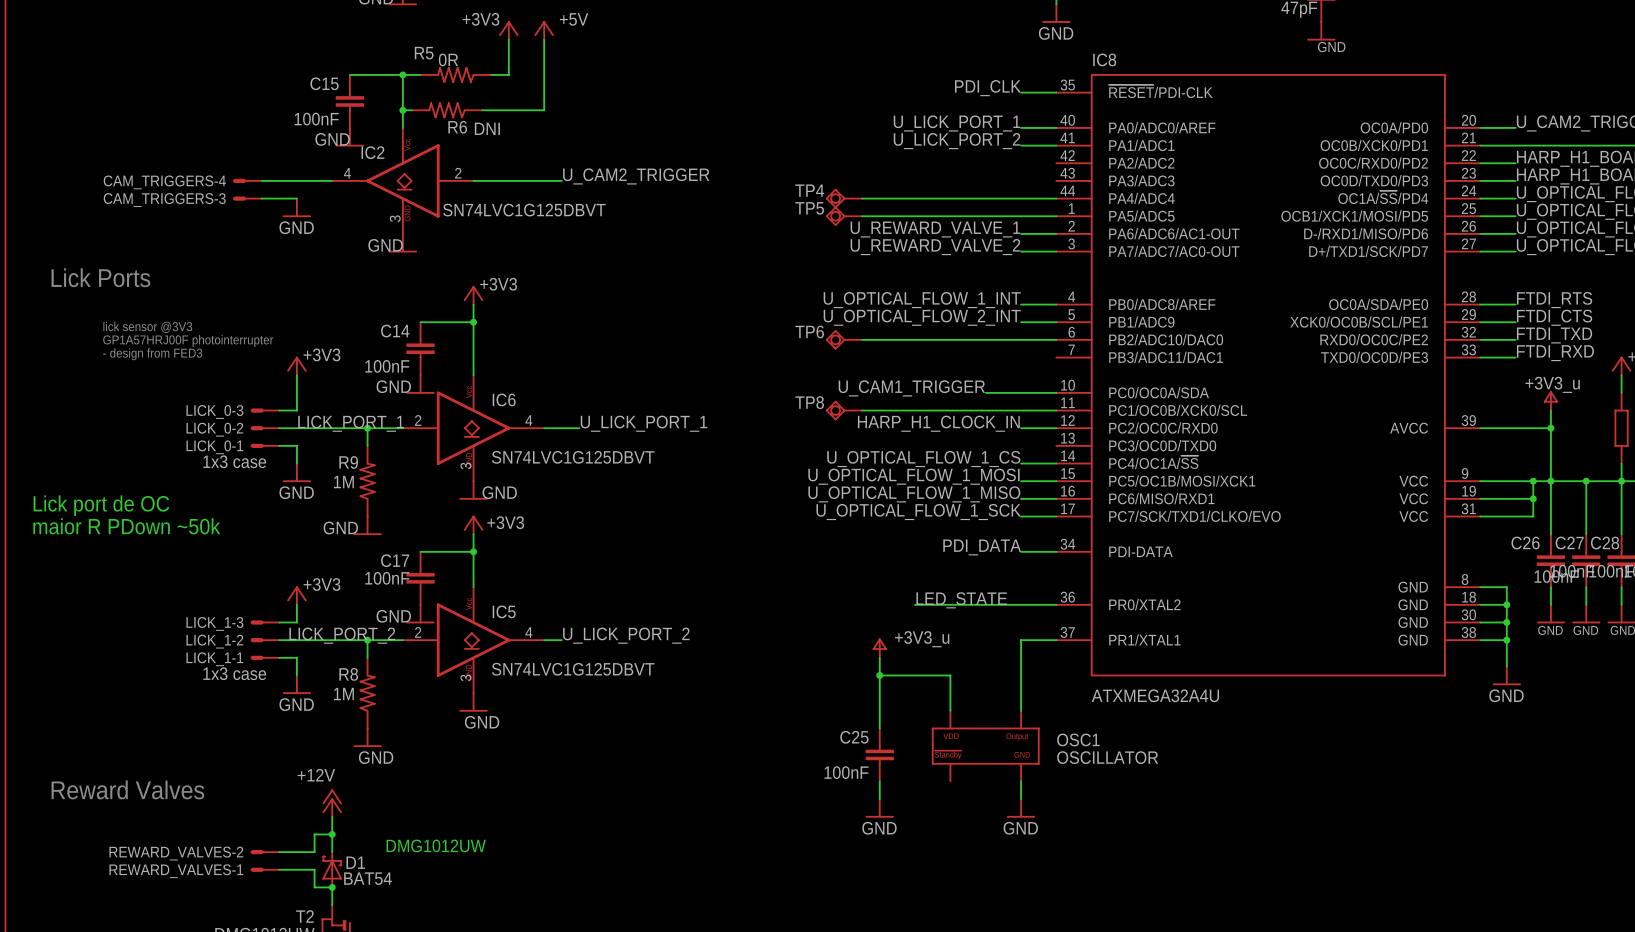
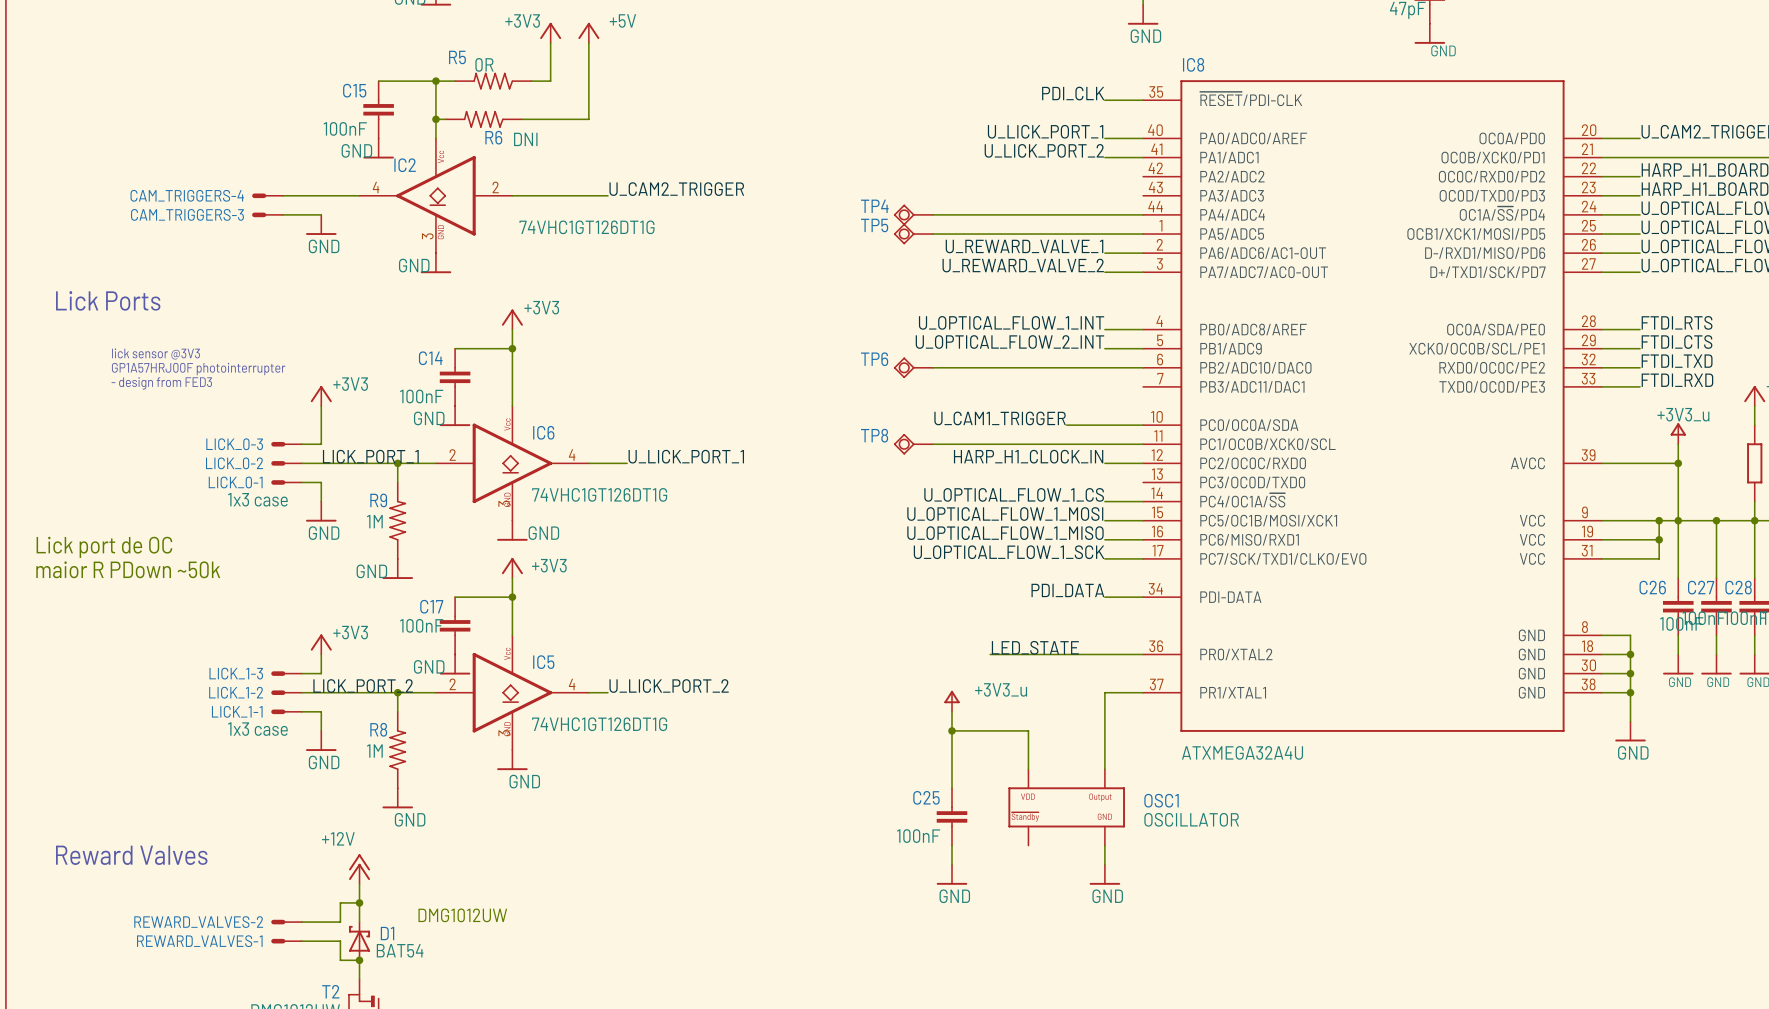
IC2 value: SN74LVC1G125DBVT (524, 210) -> 74VHC1GT126DT1G (587, 227)
IC6 value: SN74LVC1G125DBVT (573, 457) -> 74VHC1GT126DT1G (599, 494)
IC5 value: SN74LVC1G125DBVT (573, 669) -> 74VHC1GT126DT1G (599, 724)

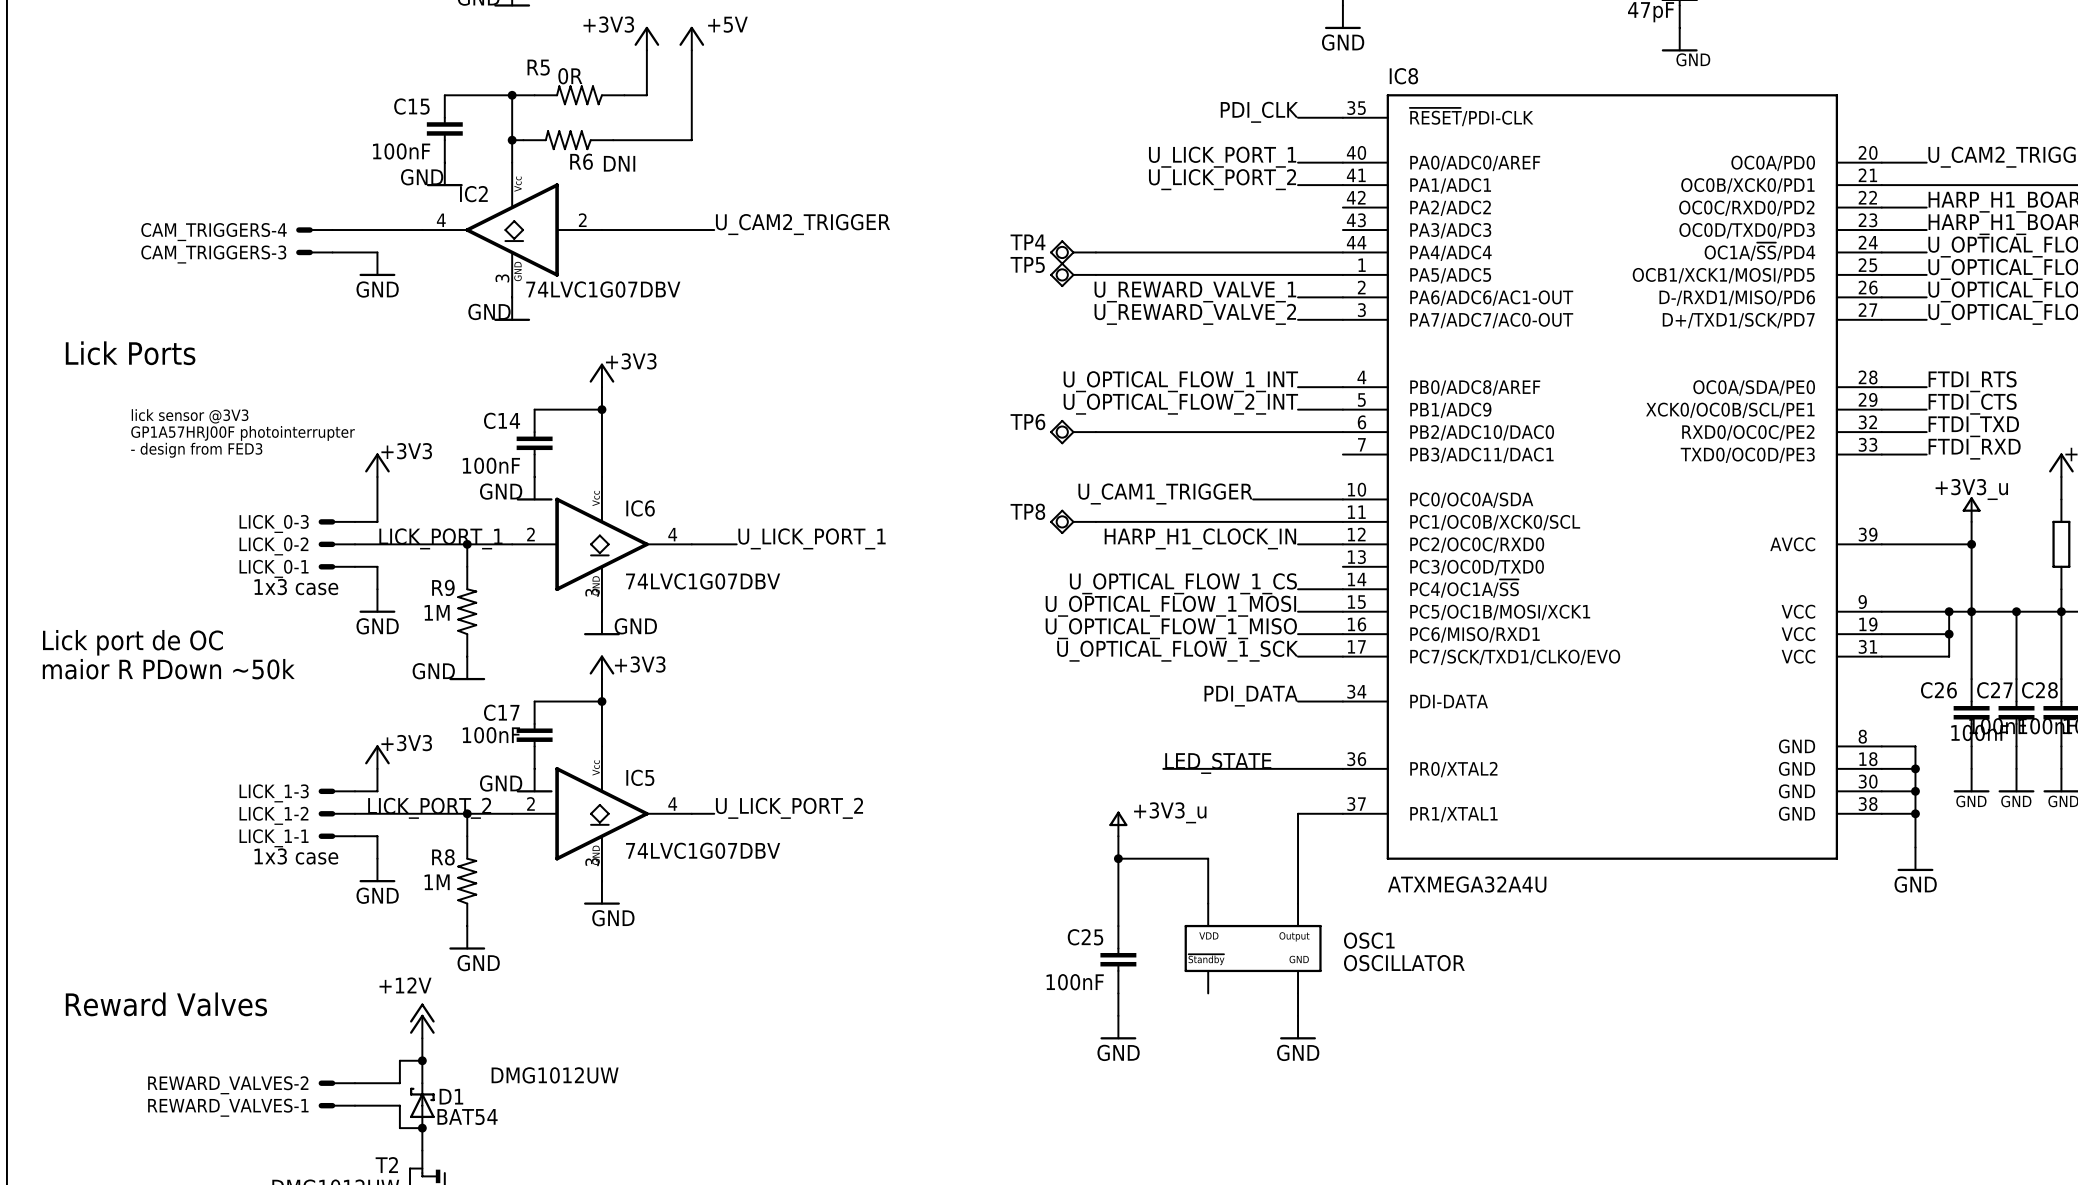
IC2 value: 74VHC1GT126DT1G (587, 227) -> 74LVC1G07DBV (603, 289)
IC6 value: 74VHC1GT126DT1G (599, 494) -> 74LVC1G07DBV (703, 581)
IC5 value: 74VHC1GT126DT1G (599, 724) -> 74LVC1G07DBV (703, 850)

